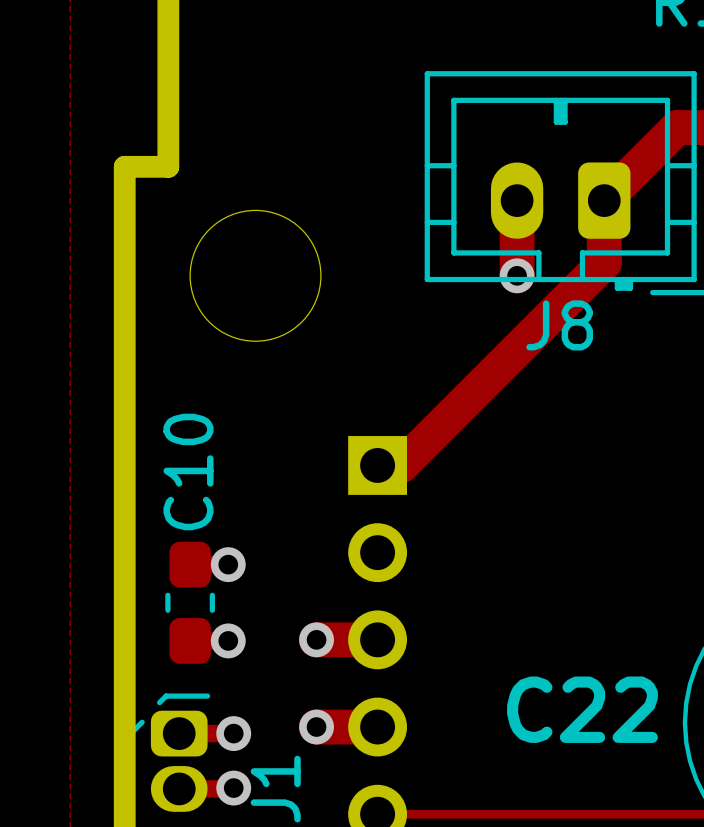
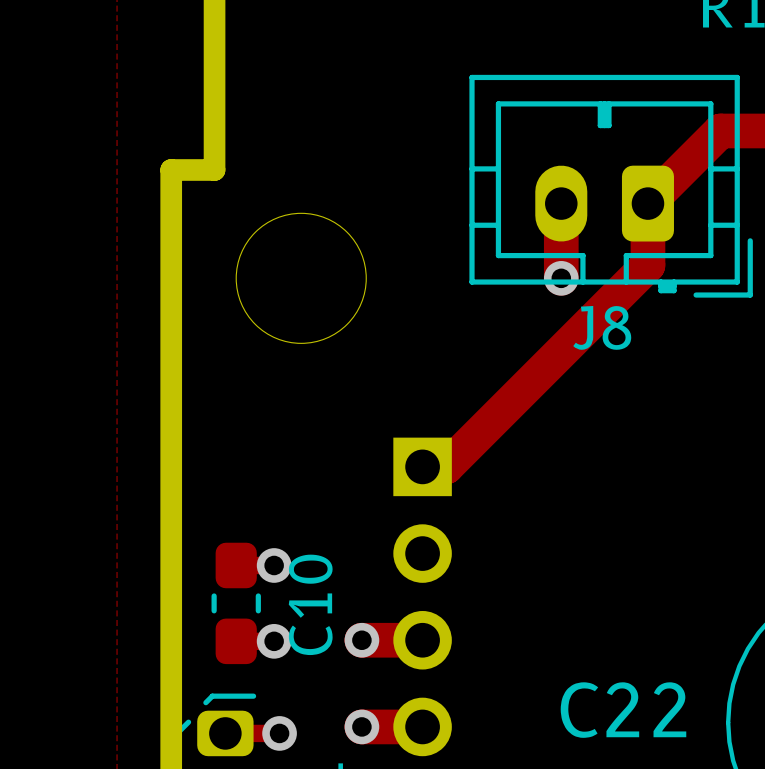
C10 name position: C10 (188, 472) -> C10 (310, 604)

